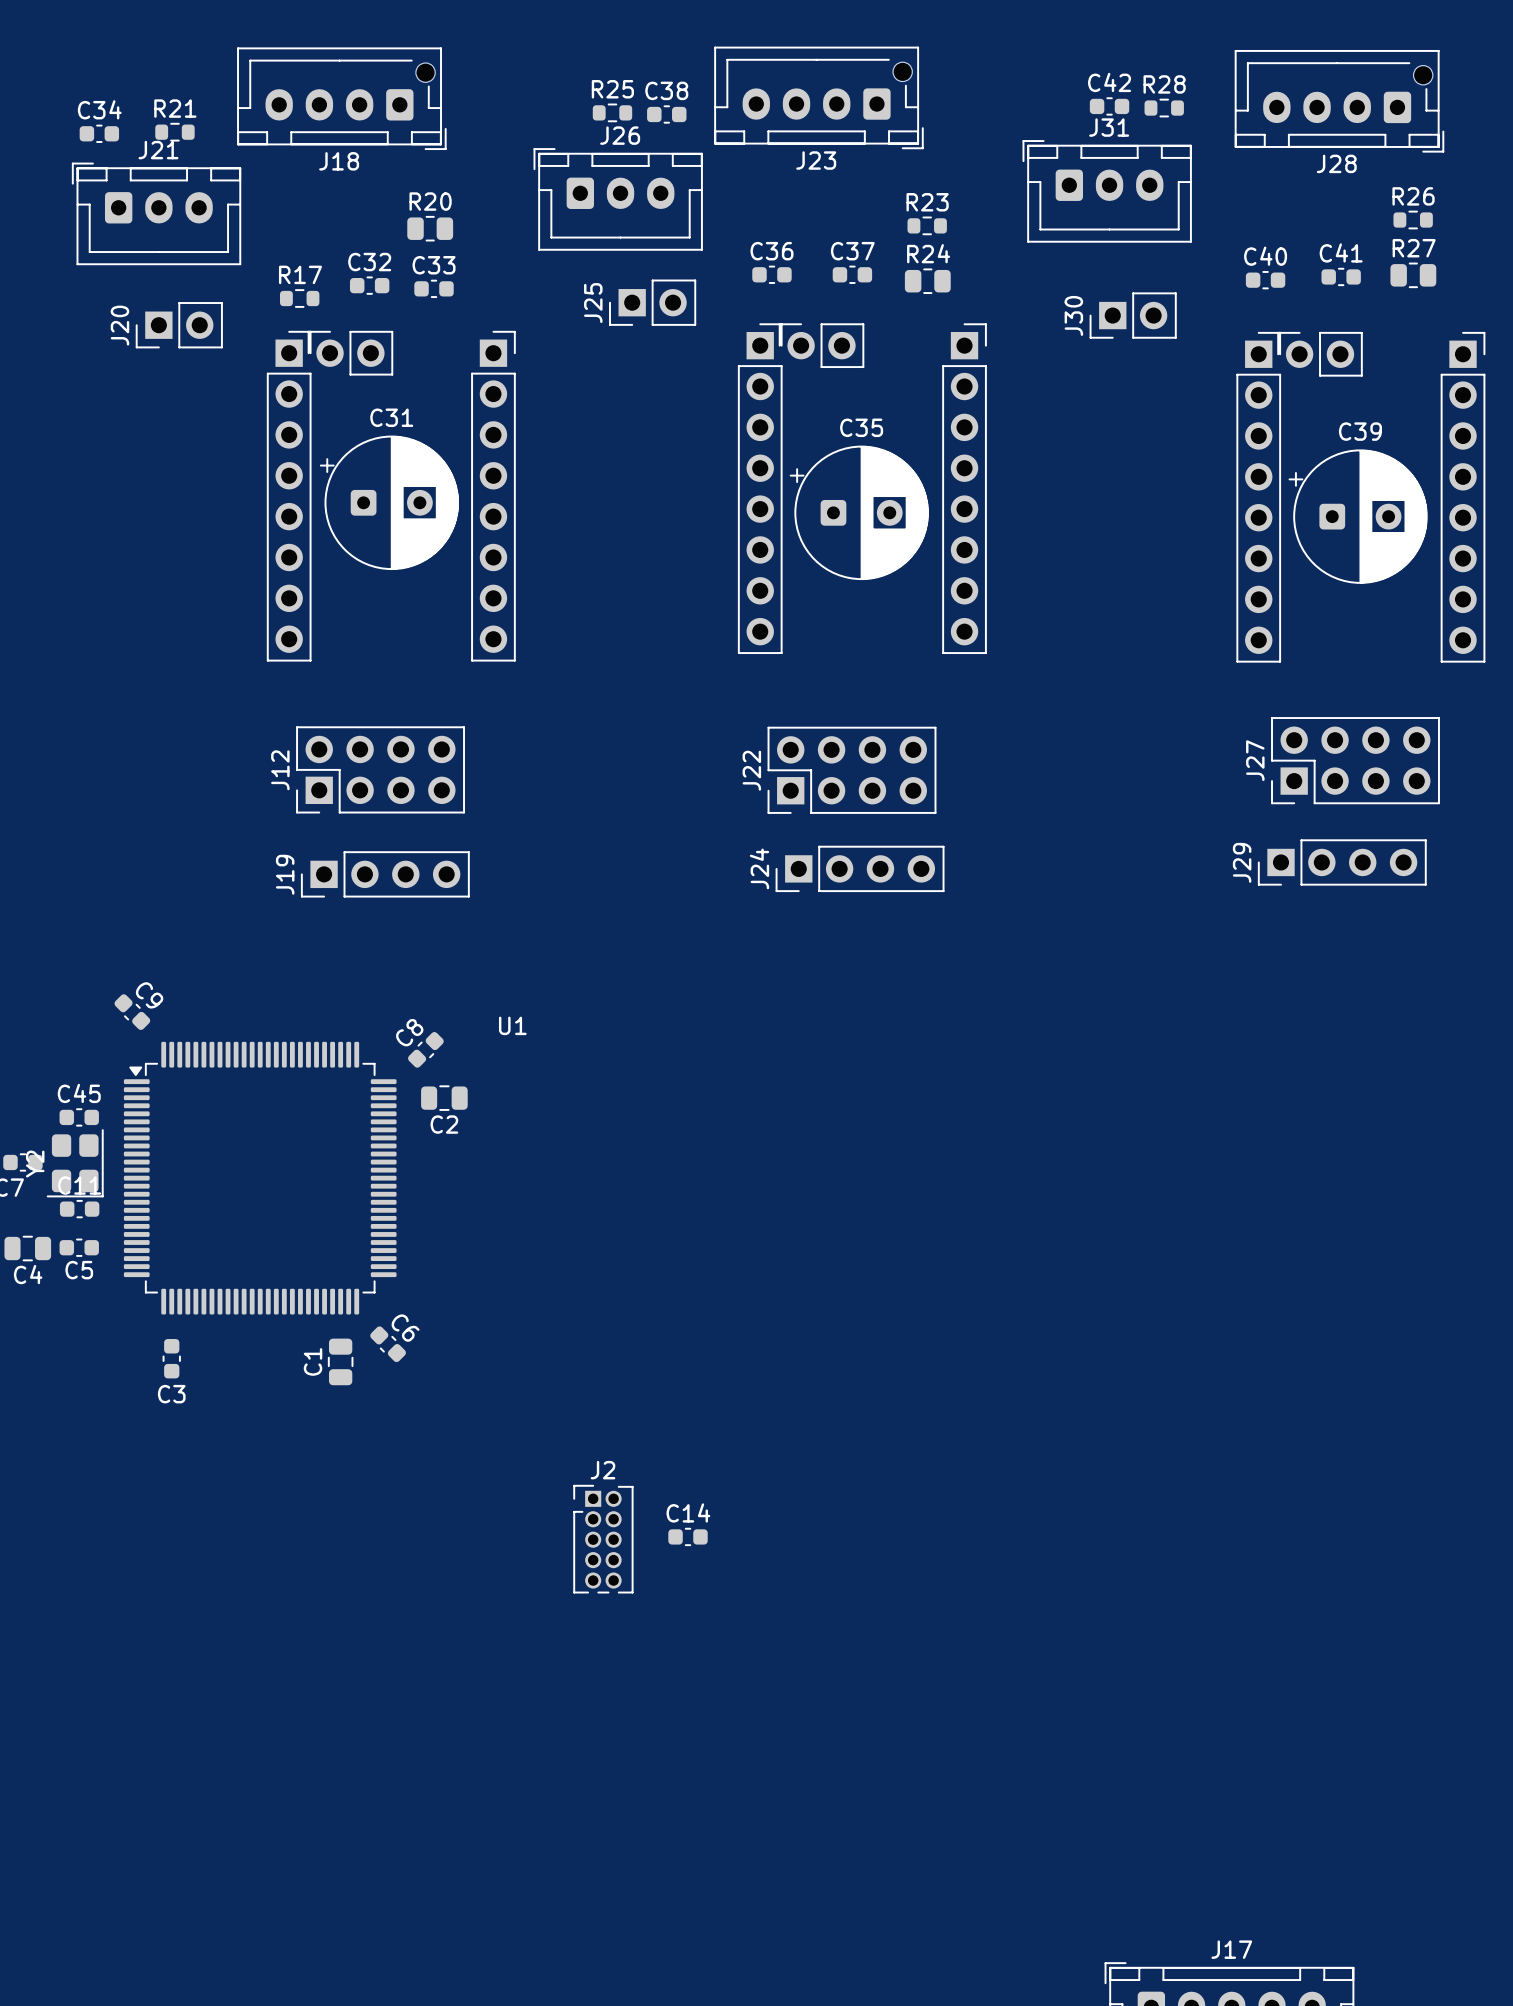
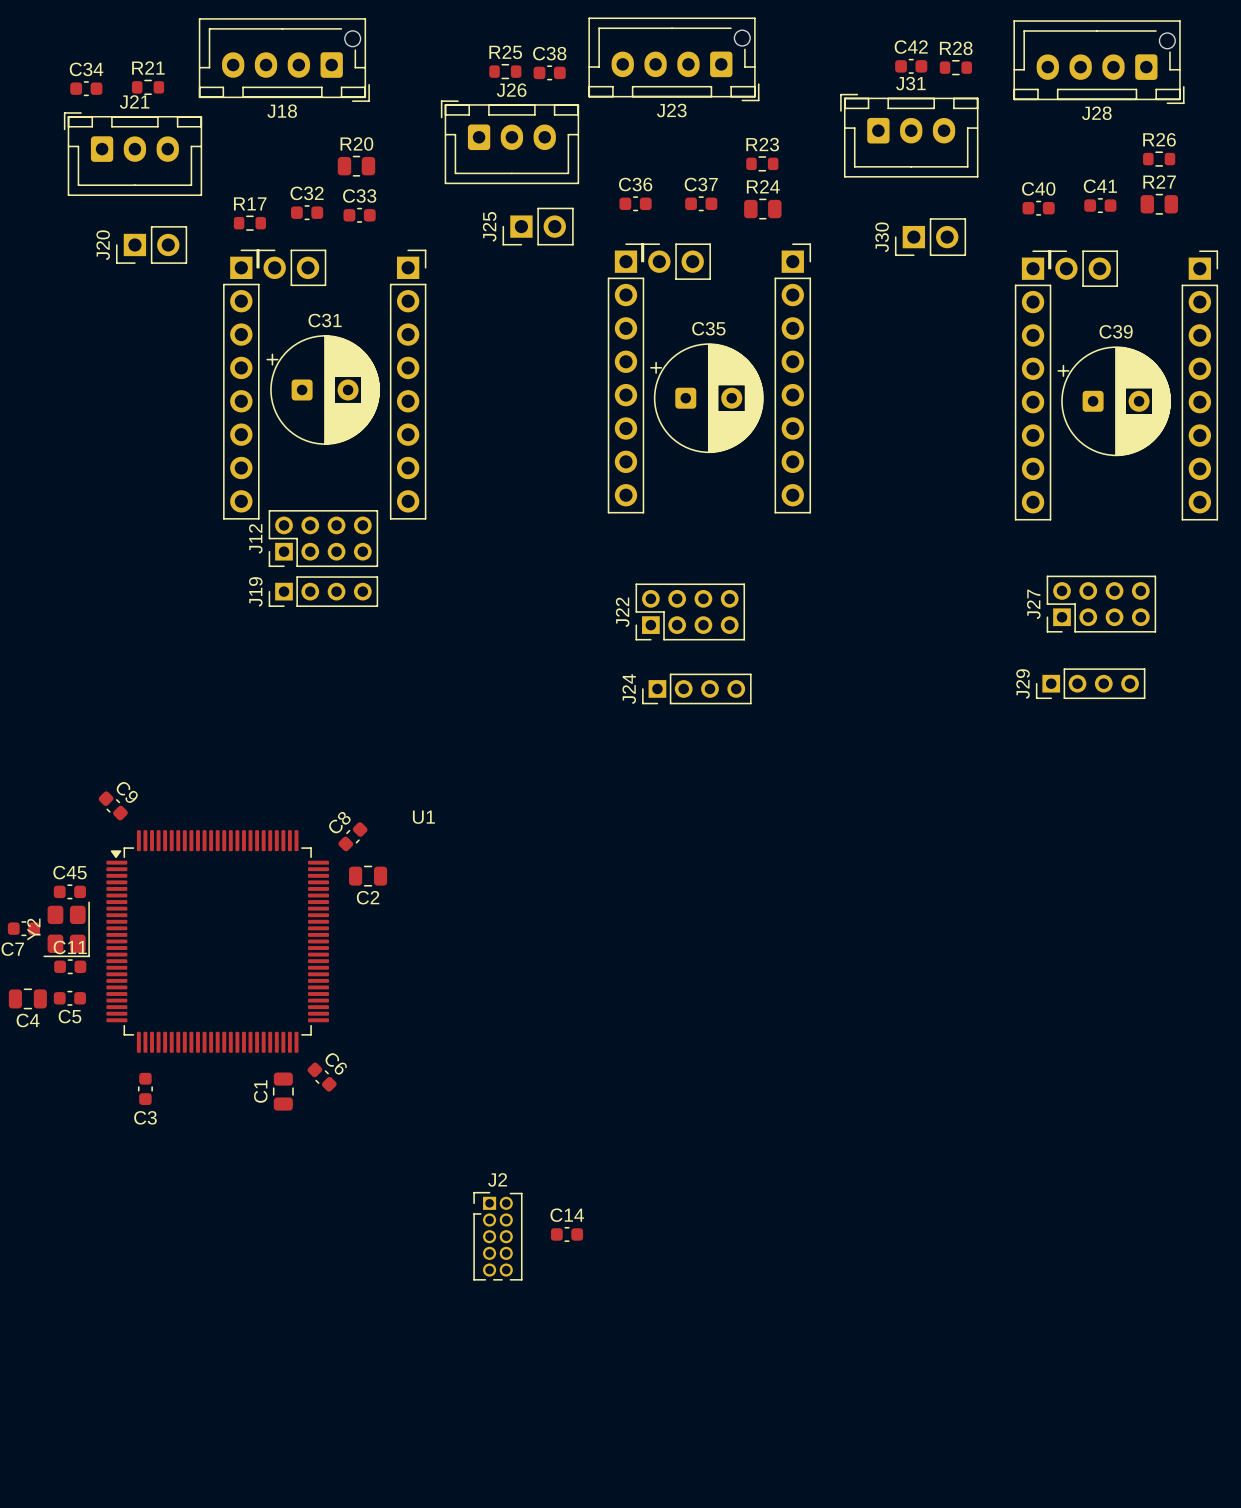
J27 footprint: [1271, 717, 1440, 805] -> [1046, 575, 1157, 633]
J12 footprint: [296, 726, 465, 814] -> [268, 510, 379, 568]
J22 footprint: [767, 726, 937, 814] -> [635, 583, 746, 641]
J29 footprint: [1257, 839, 1427, 886] -> [1035, 668, 1146, 700]
J24 footprint: [775, 845, 945, 893] -> [642, 673, 752, 705]
J19 footprint: [300, 851, 470, 898] -> [268, 576, 379, 607]

